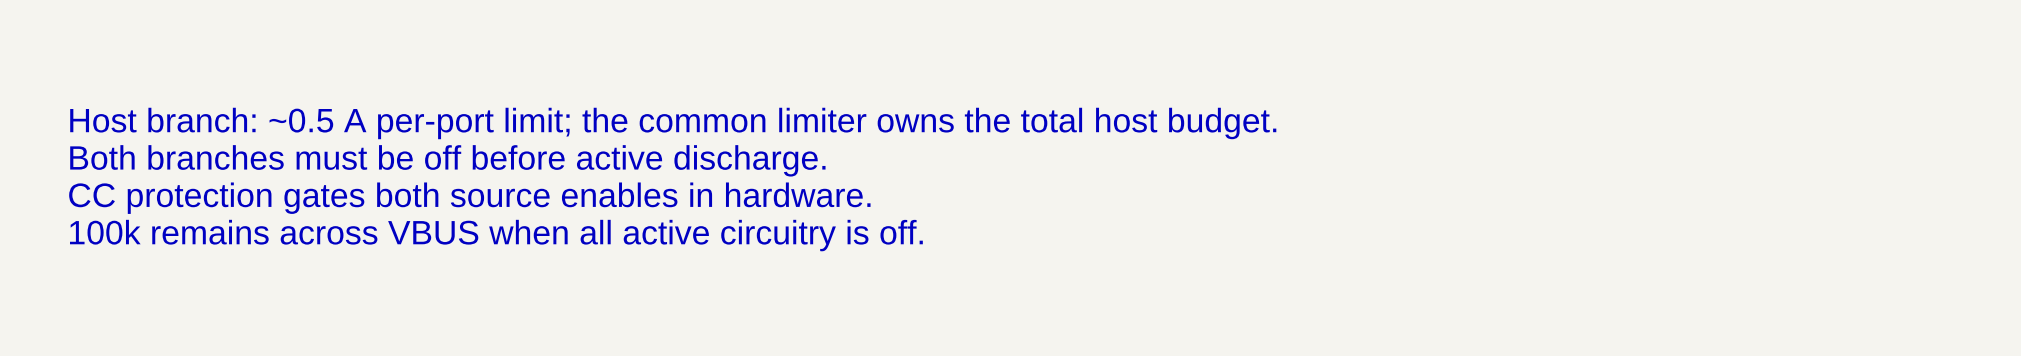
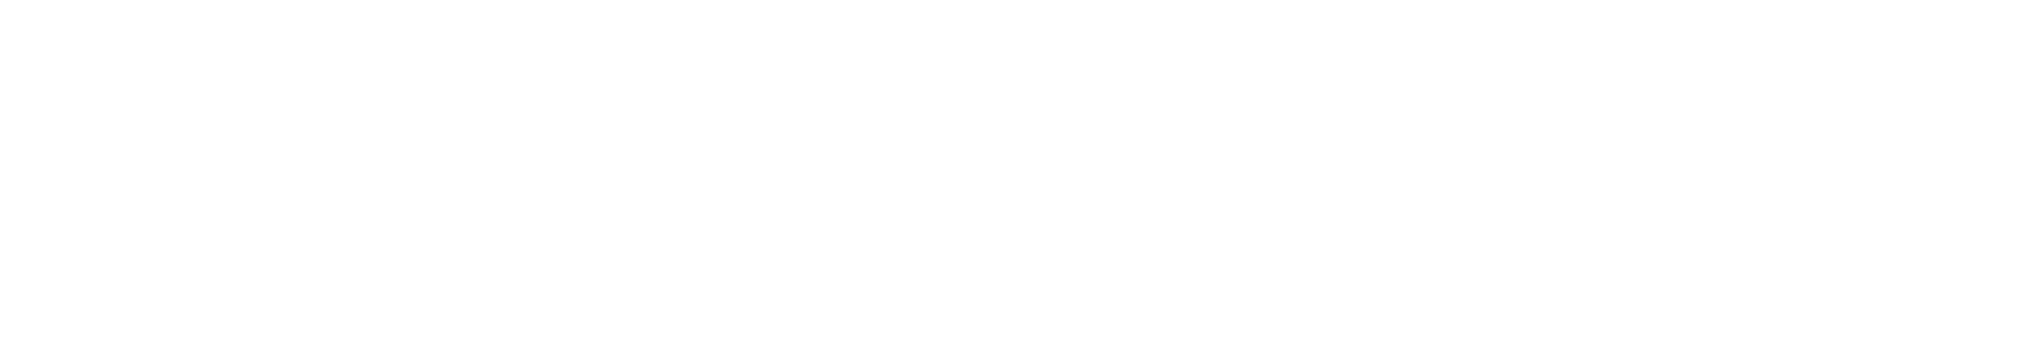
text: Host branch: ~0.5 A per-port limit; the common limiter owns the total host budget. (673, 123) -> none
text: Both branches must be off before active discharge. (447, 160) -> none
text: CC protection gates both source enables in hardware. (469, 198) -> none
text: 100k remains across VBUS when all active circuitry is off. (496, 235) -> none

